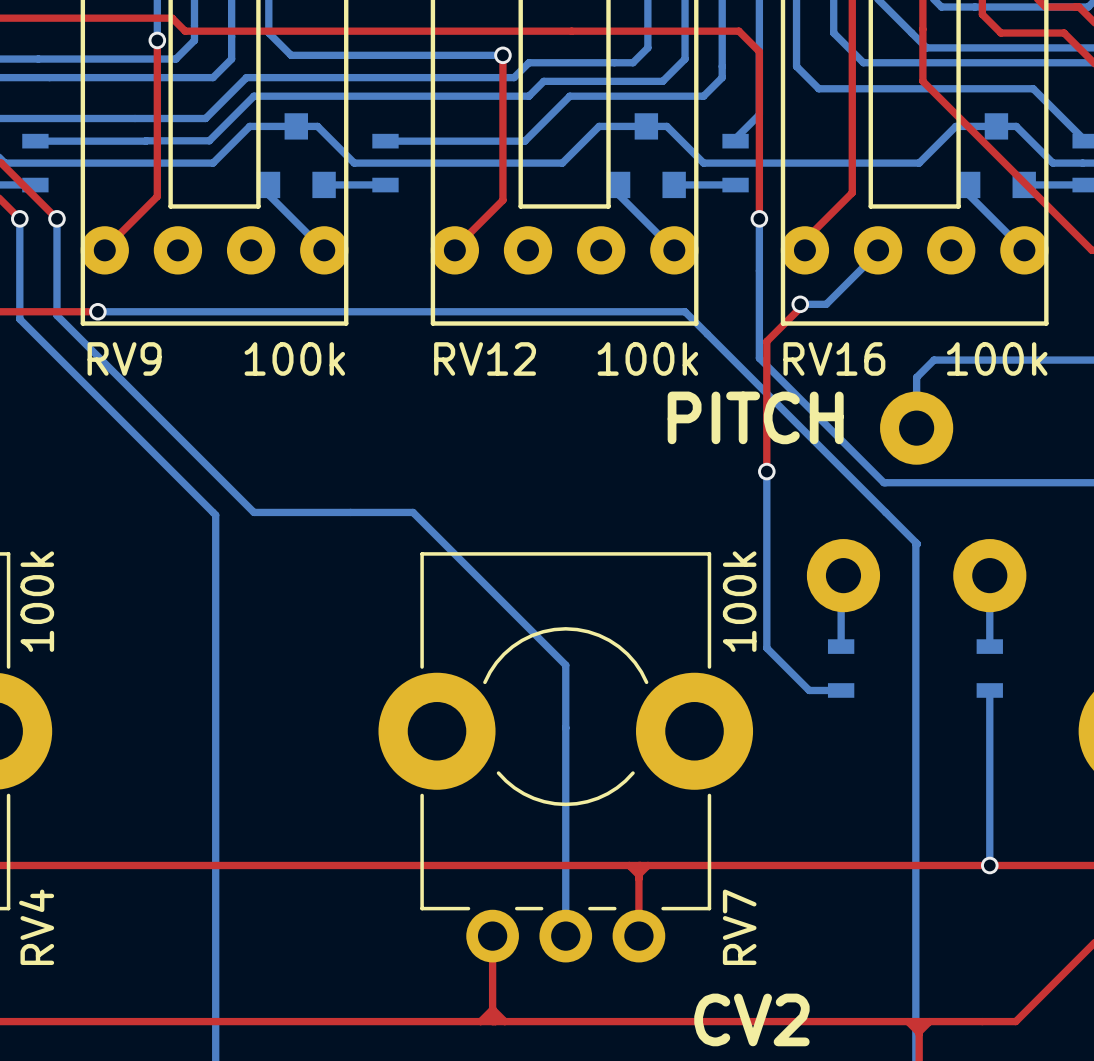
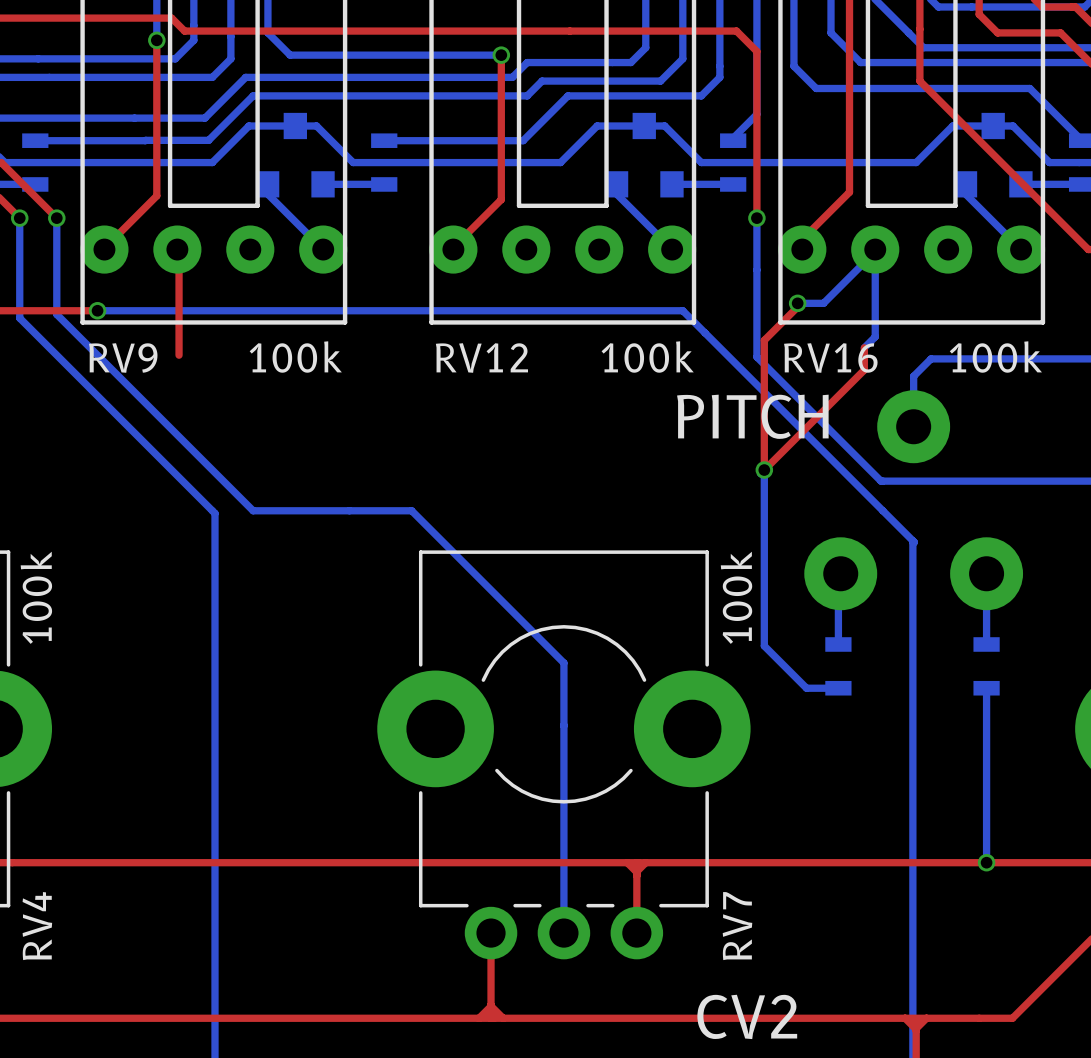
top track: none -> (179, 251) (179, 355)
bottom track: none -> (875, 251) (875, 336) (864, 347)
top track: none -> (864, 347) (864, 370) (764, 470)

